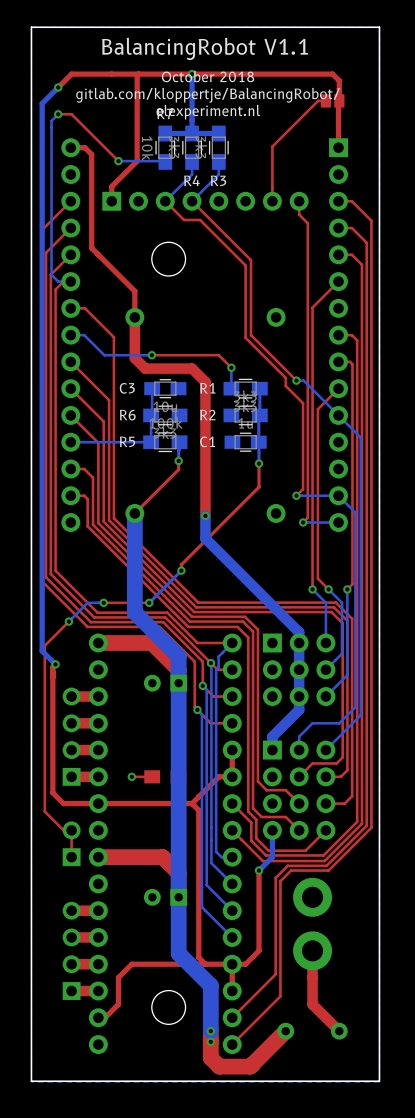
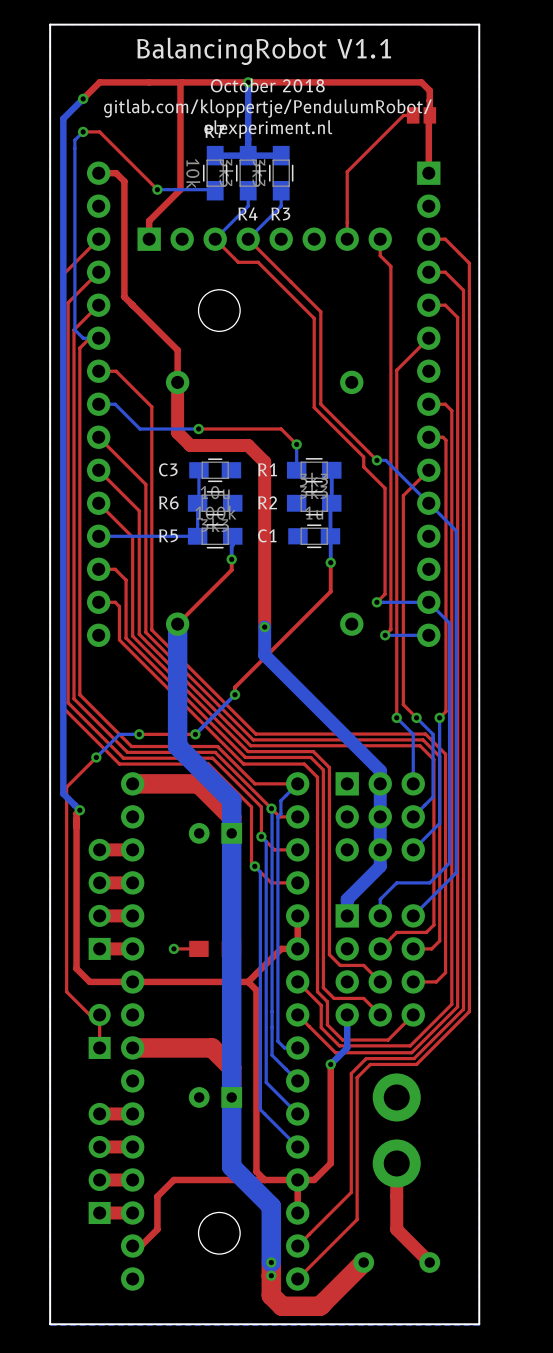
text: gitlab.com/kloppertje/BalancingRobot/ (208, 95) -> gitlab.com/kloppertje/PendulumRobot/ (267, 108)

